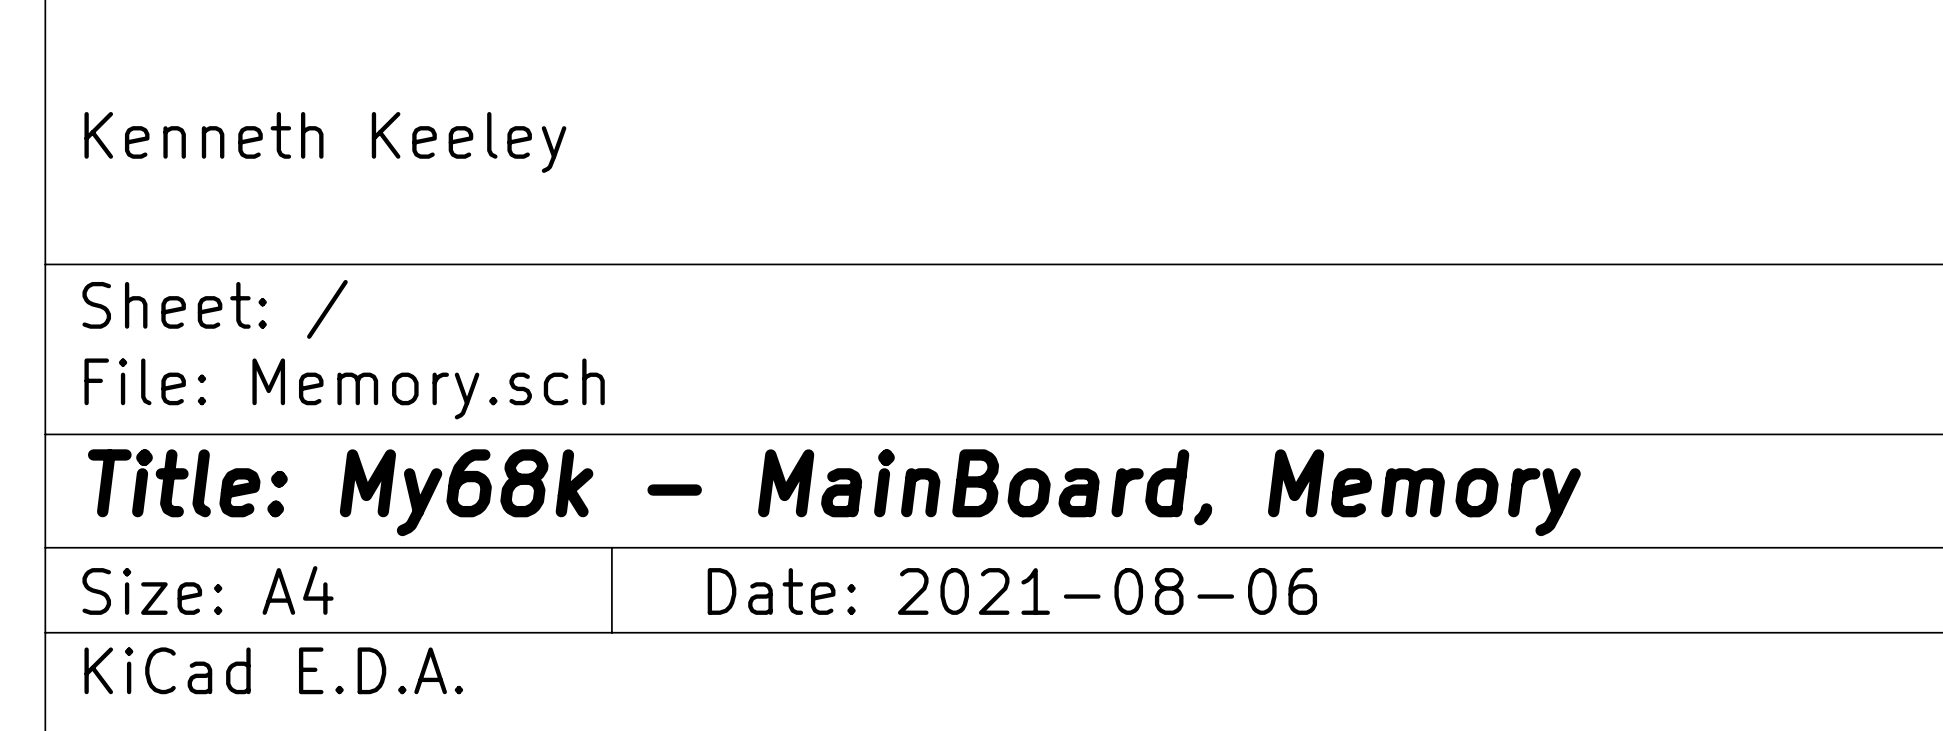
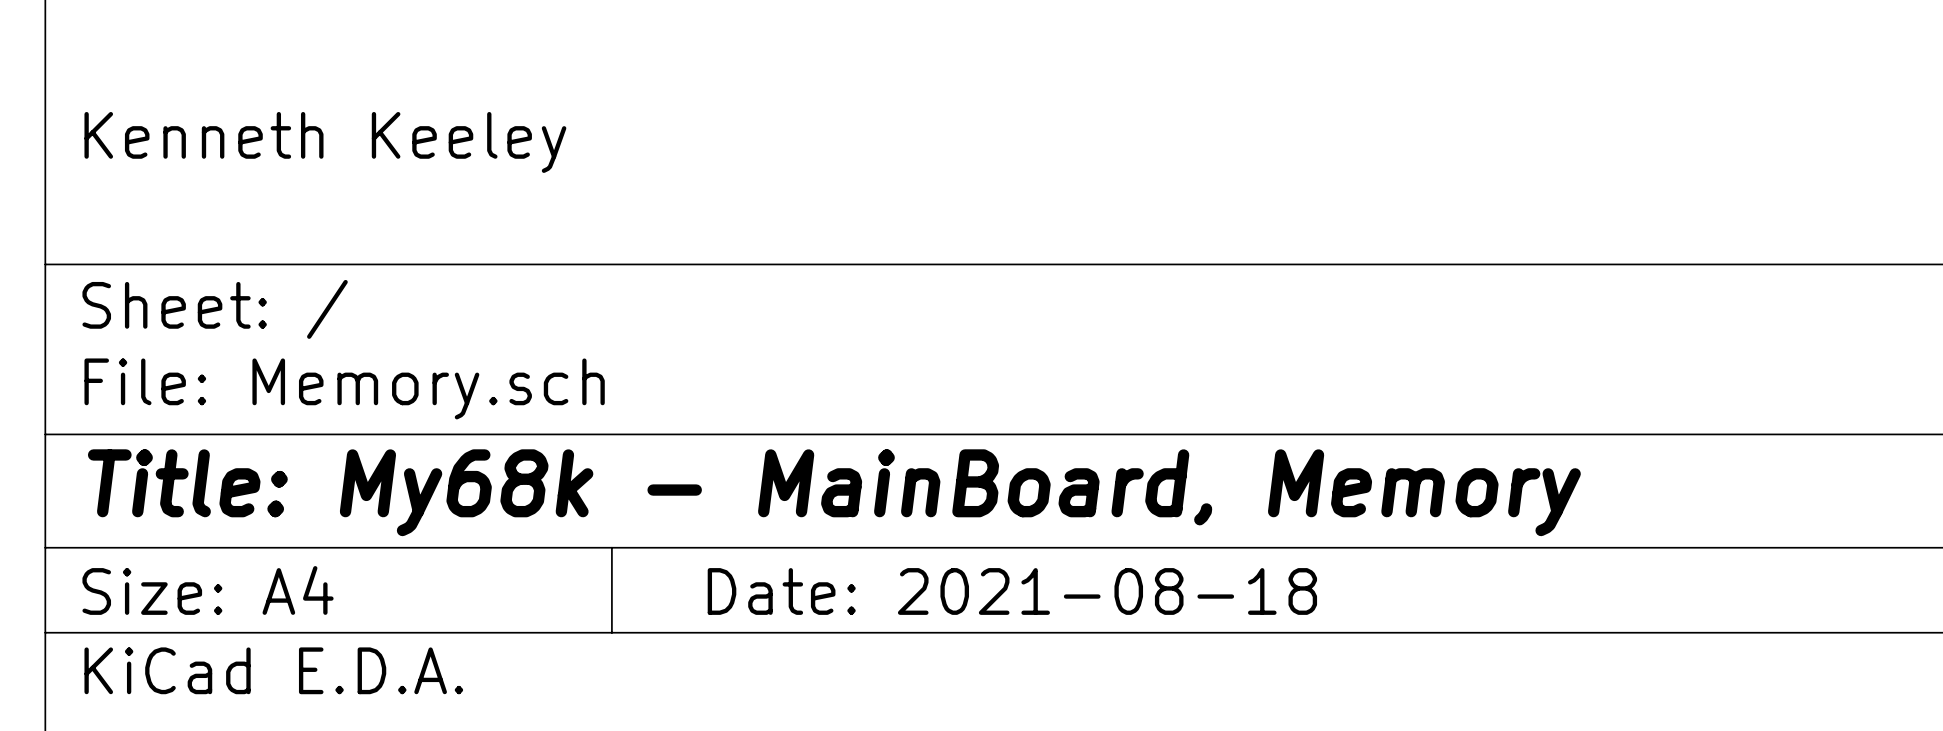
title block: Date: 2021-08-06 (1012, 591) -> Date: 2021-08-18 (1012, 591)

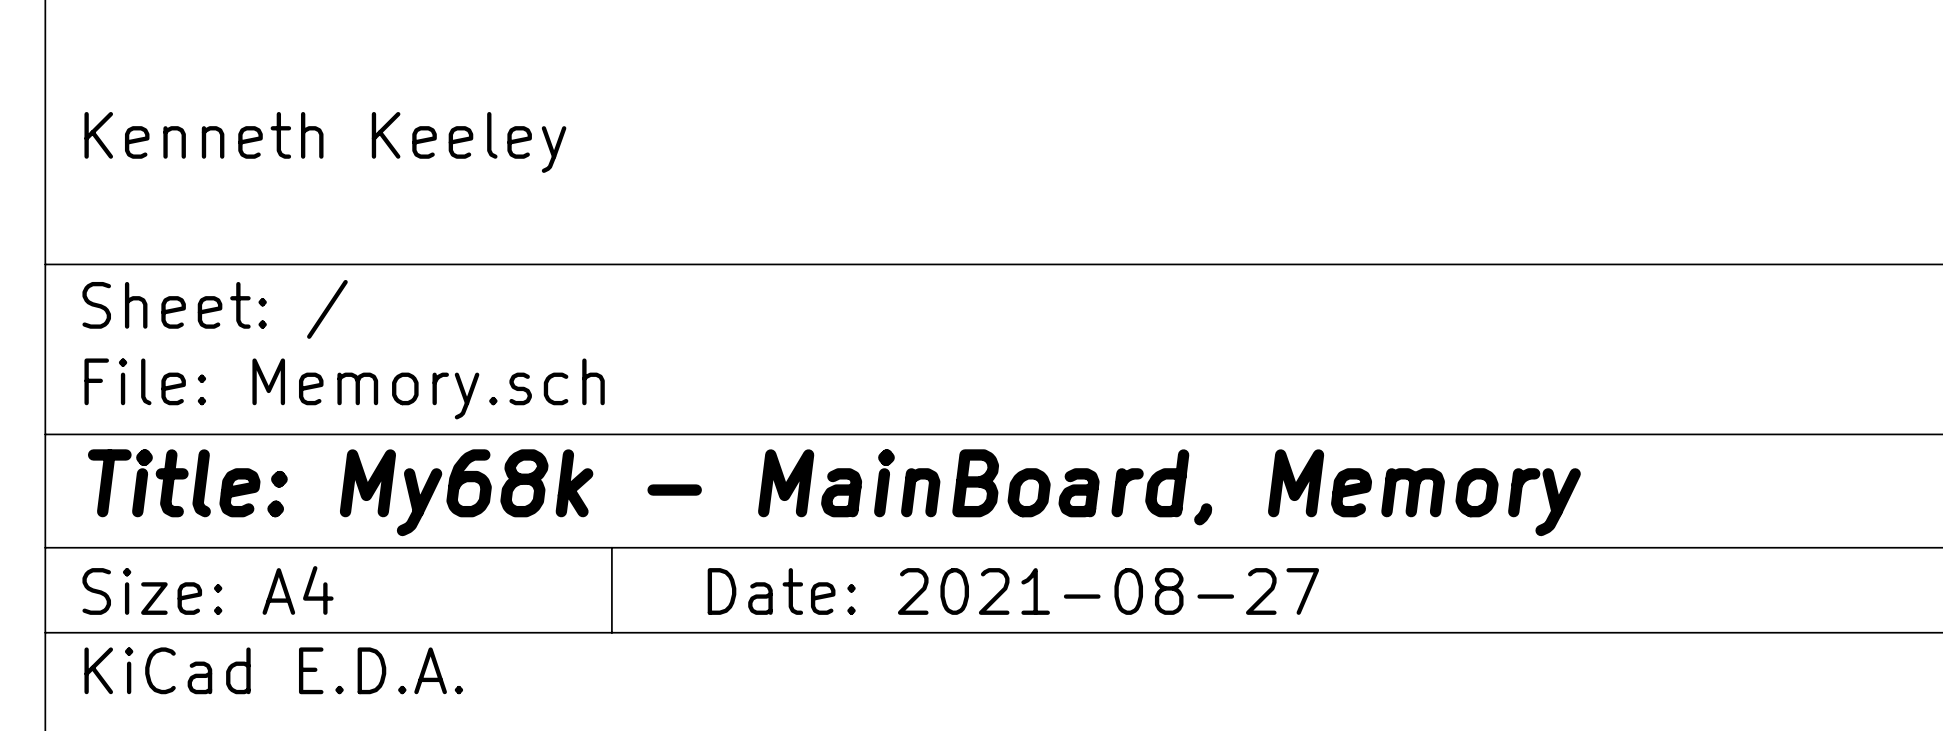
title block: Date: 2021-08-18 (1012, 591) -> Date: 2021-08-27 (1013, 591)

